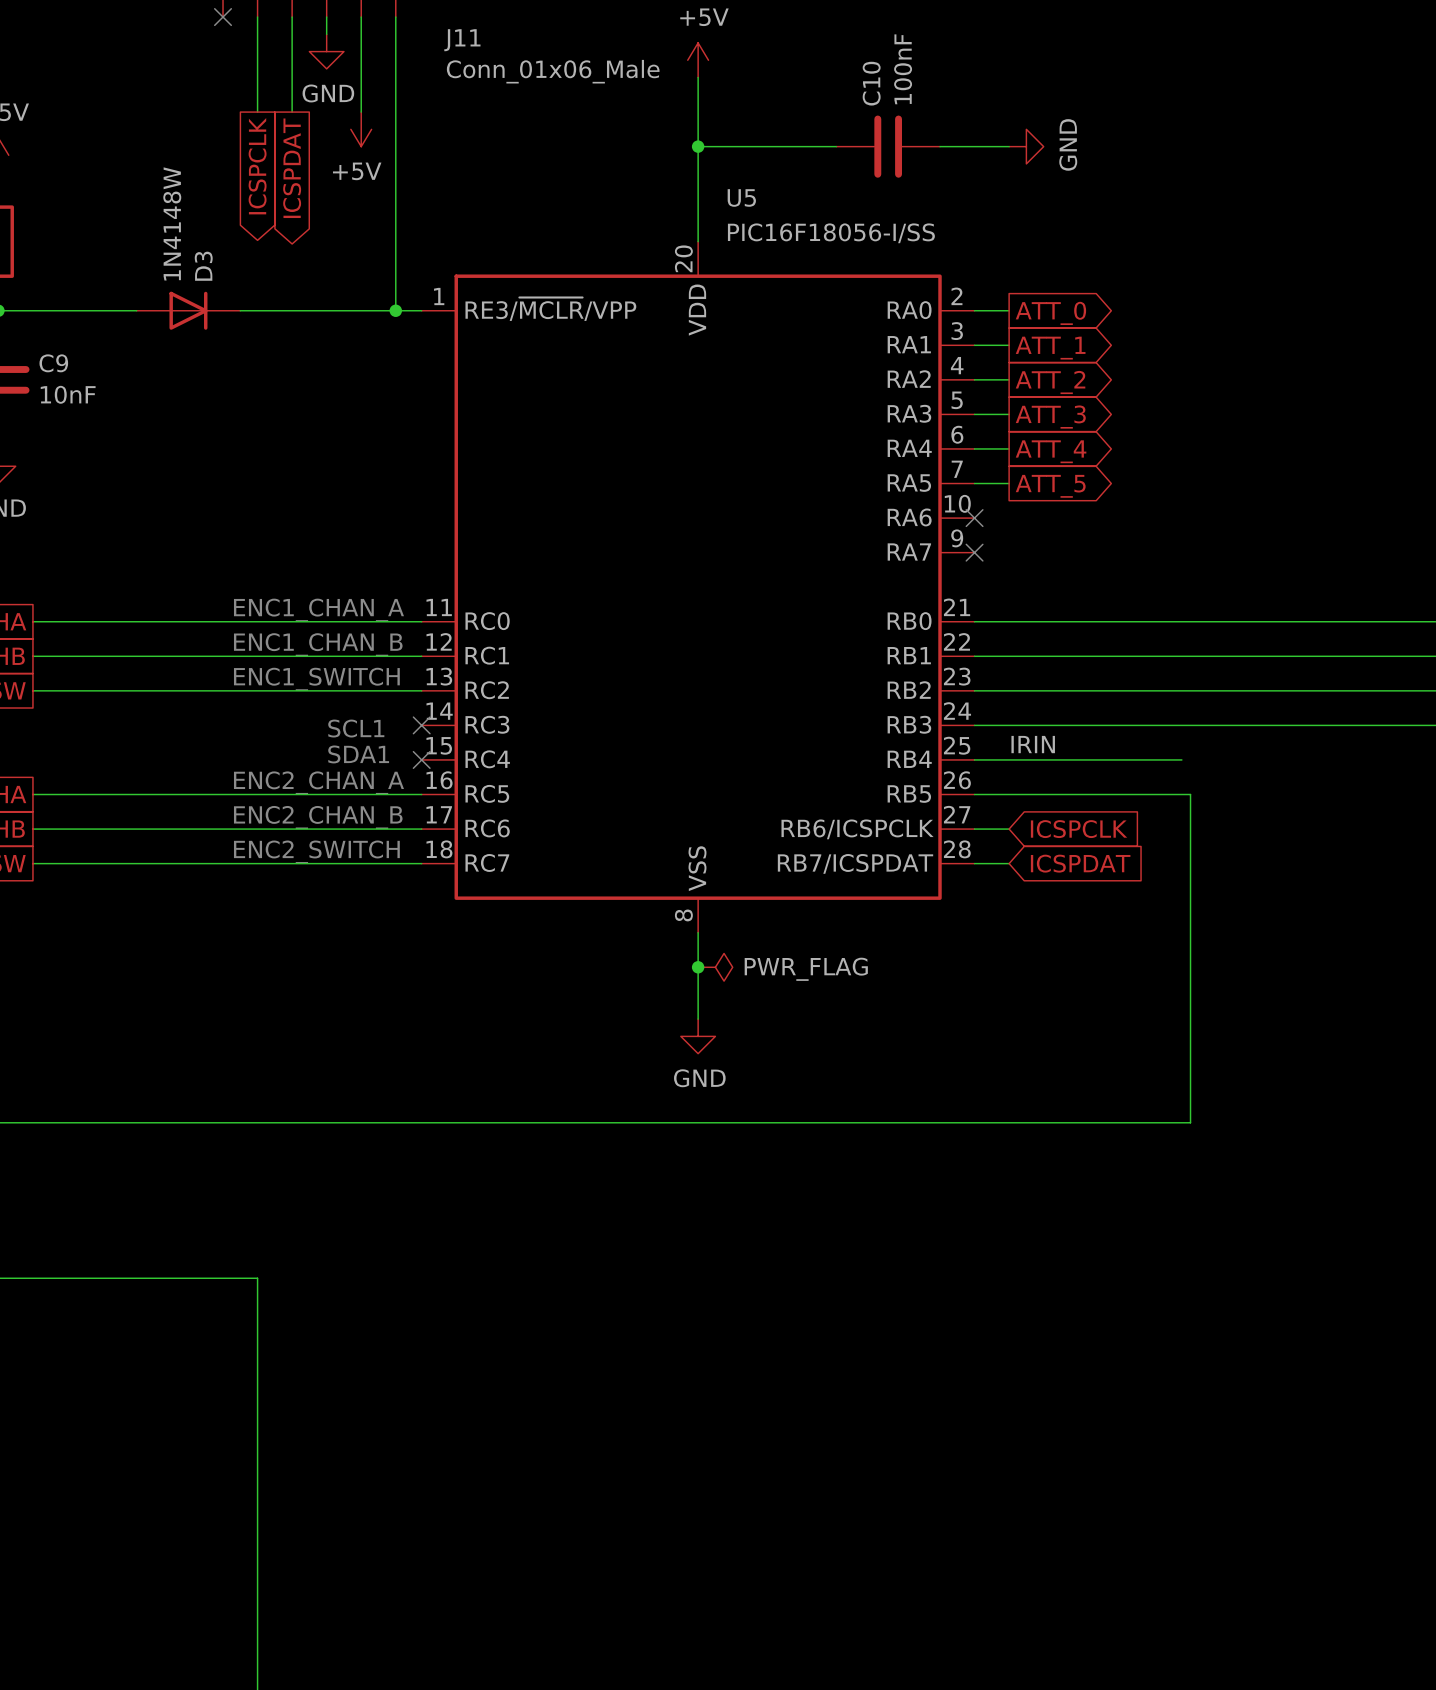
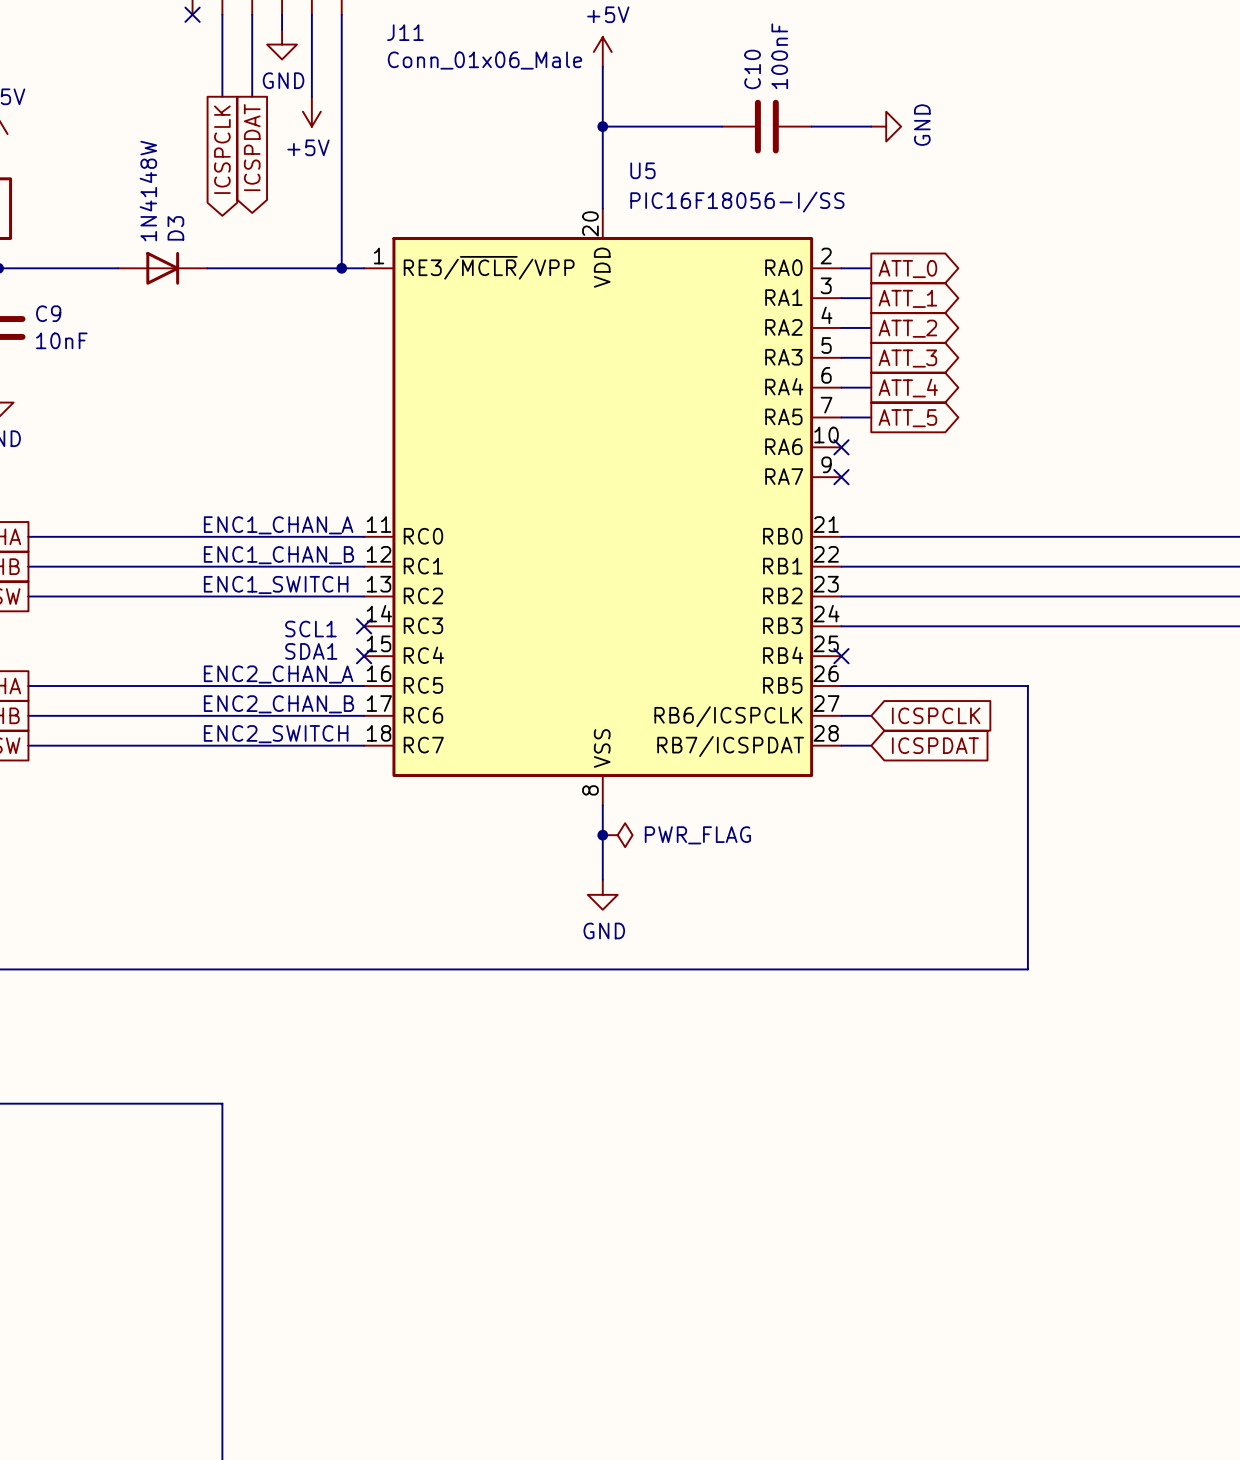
label: IRIN (1033, 744) -> none
wire: (974, 759) (1181, 759) -> none
no-connect mark: none -> (841, 656)

